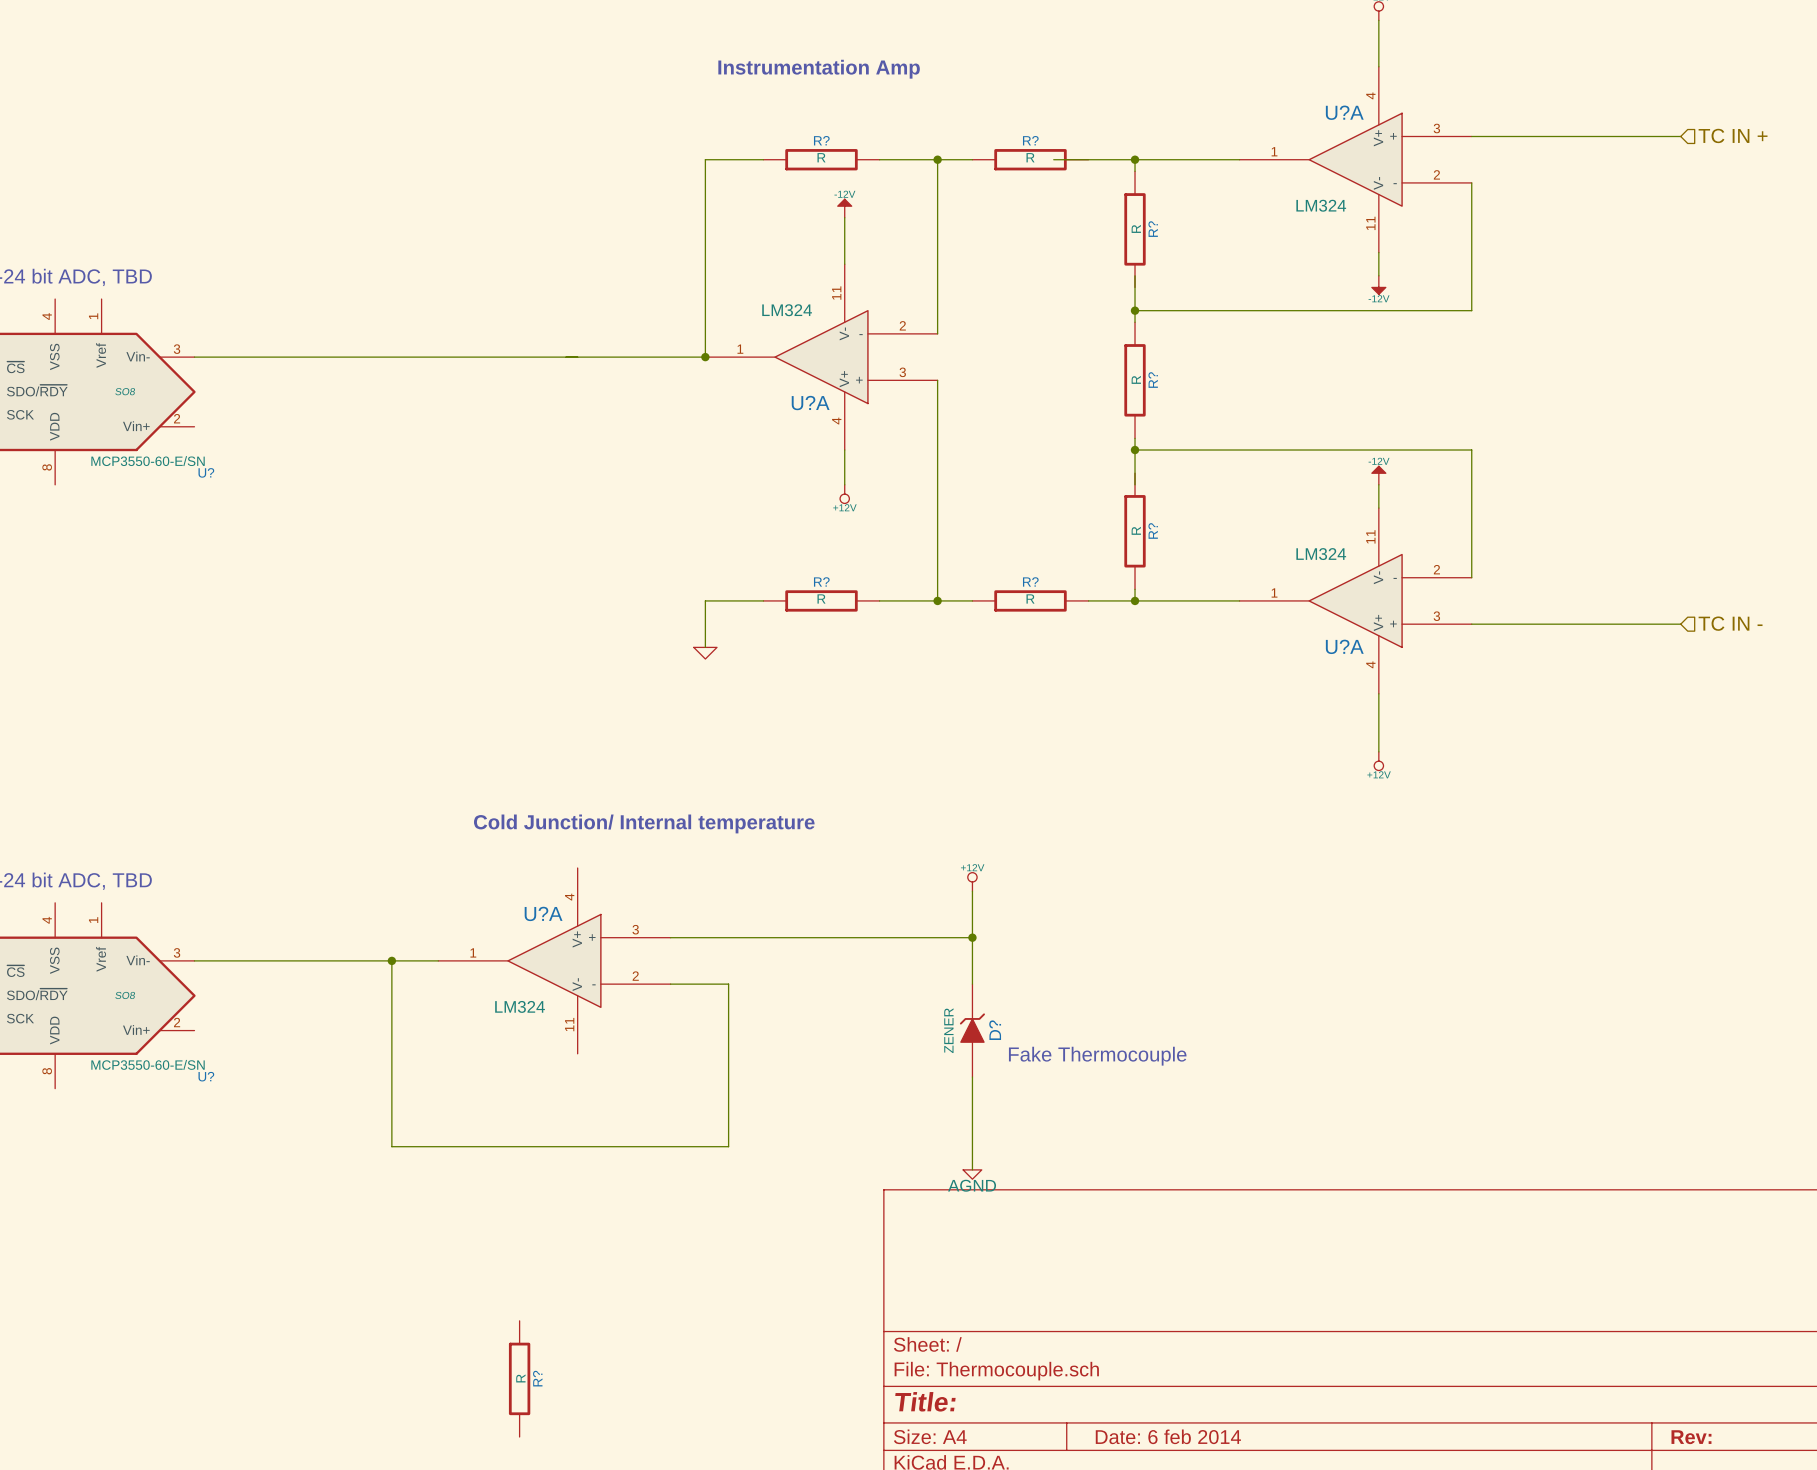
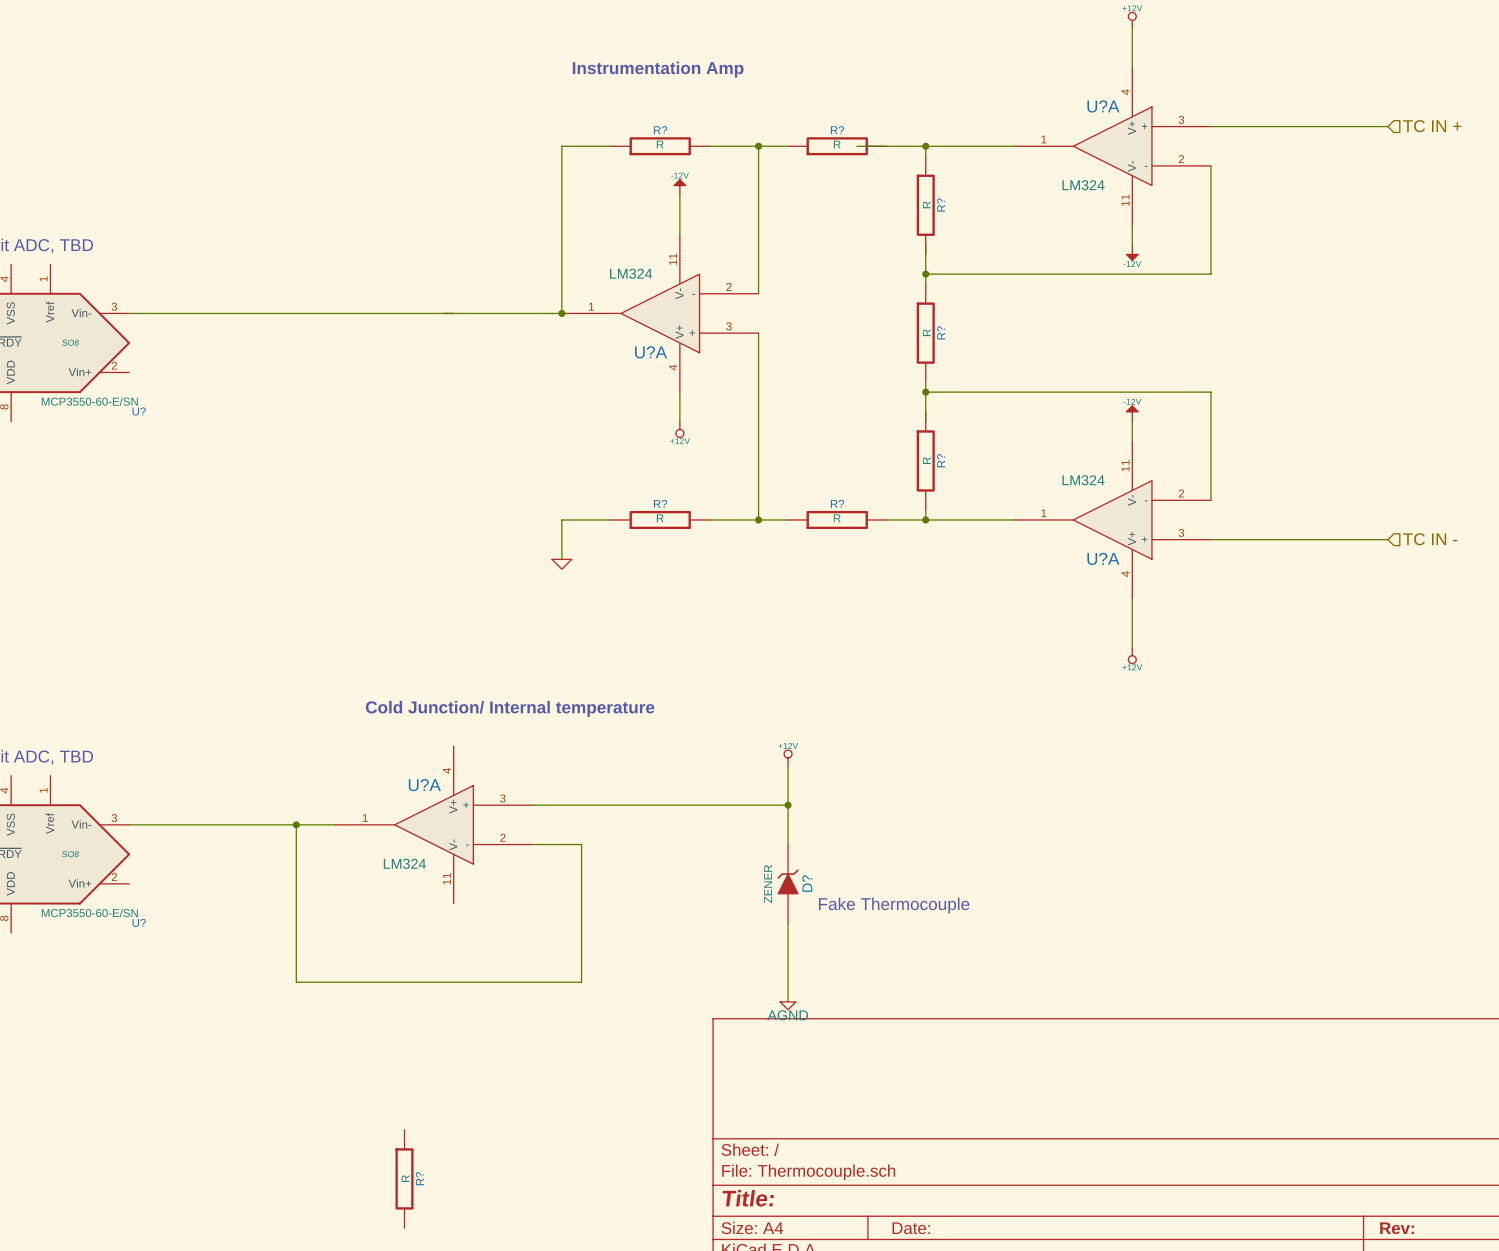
title block: Date: 6 feb 2014 (1168, 1436) -> Date: (911, 1228)

